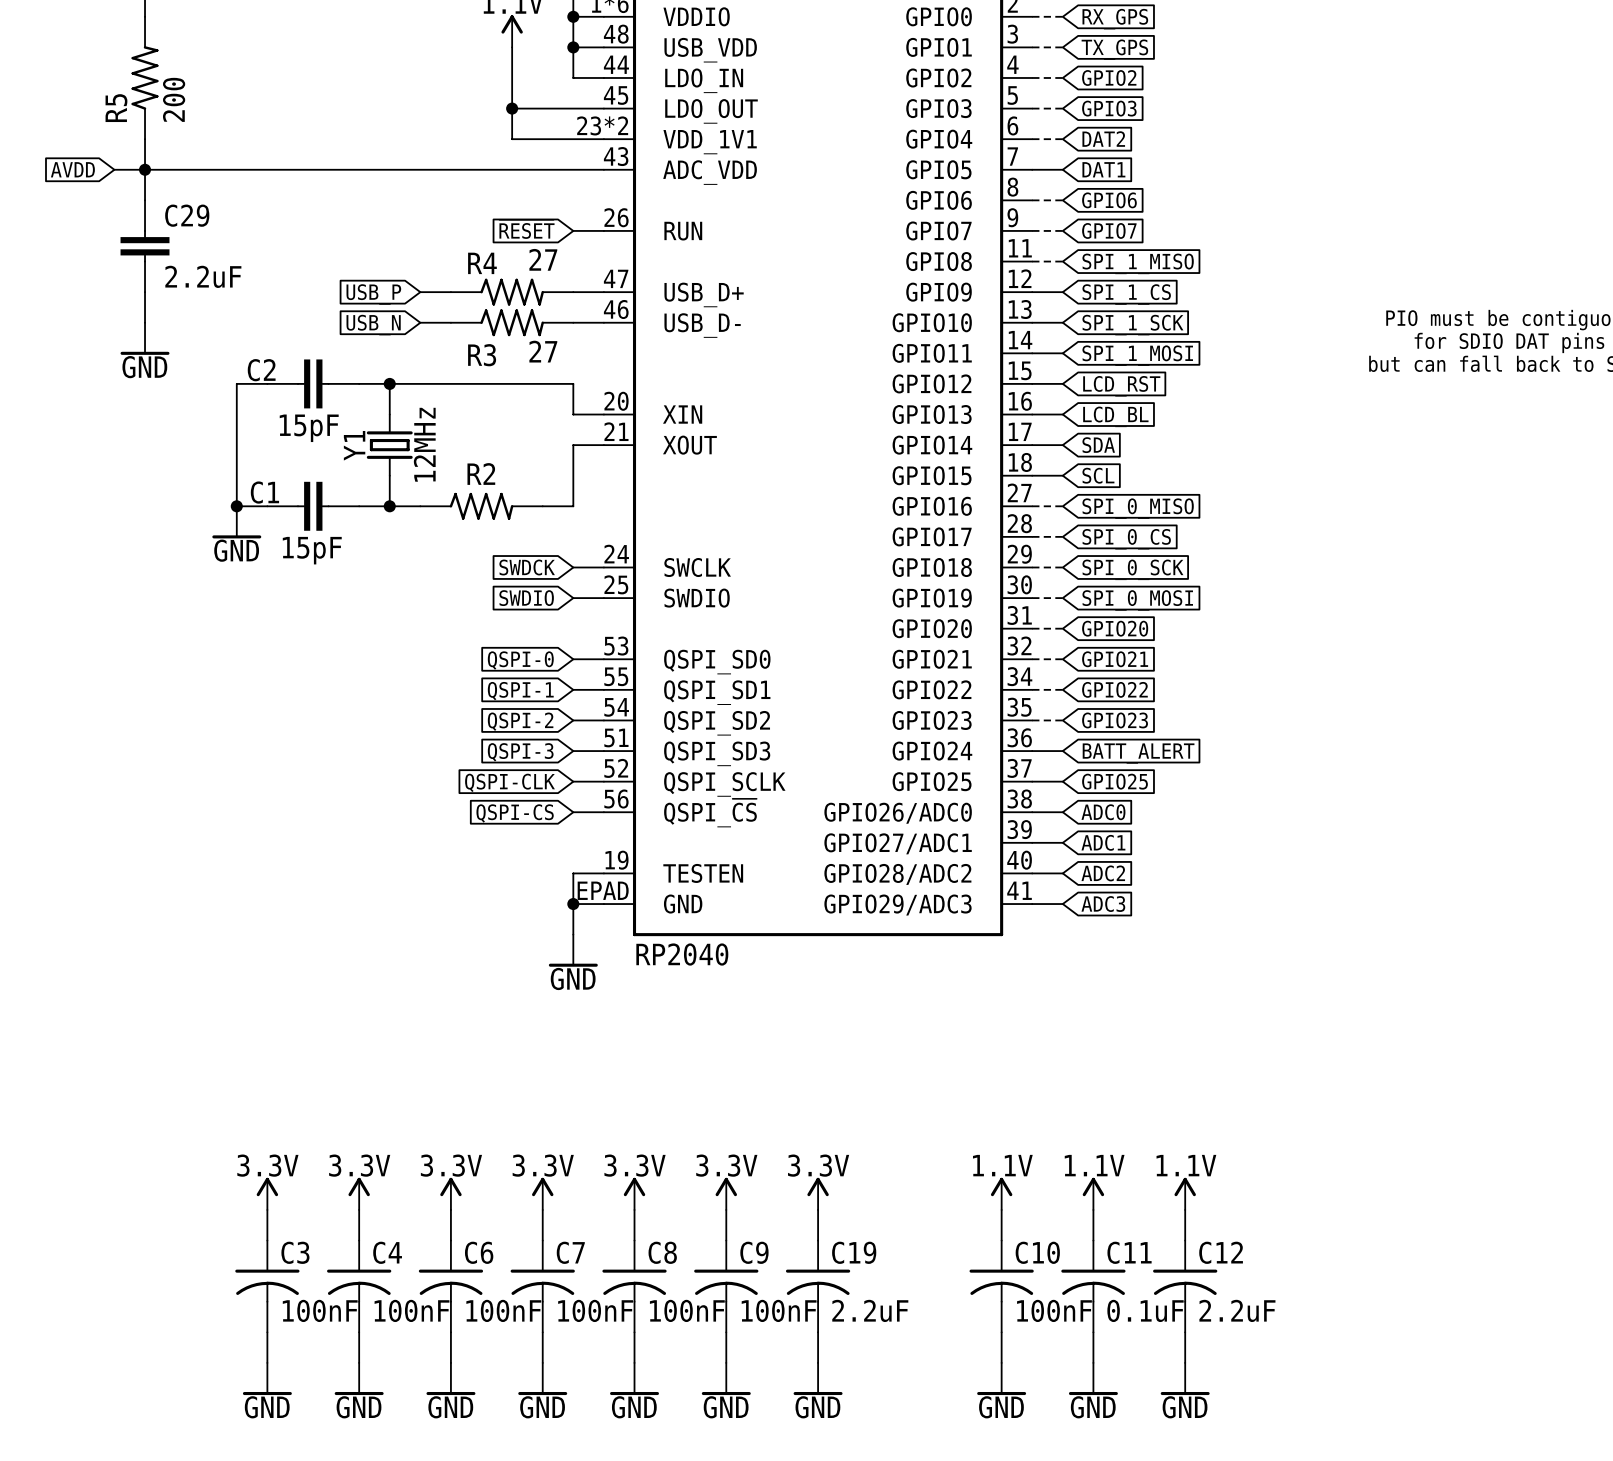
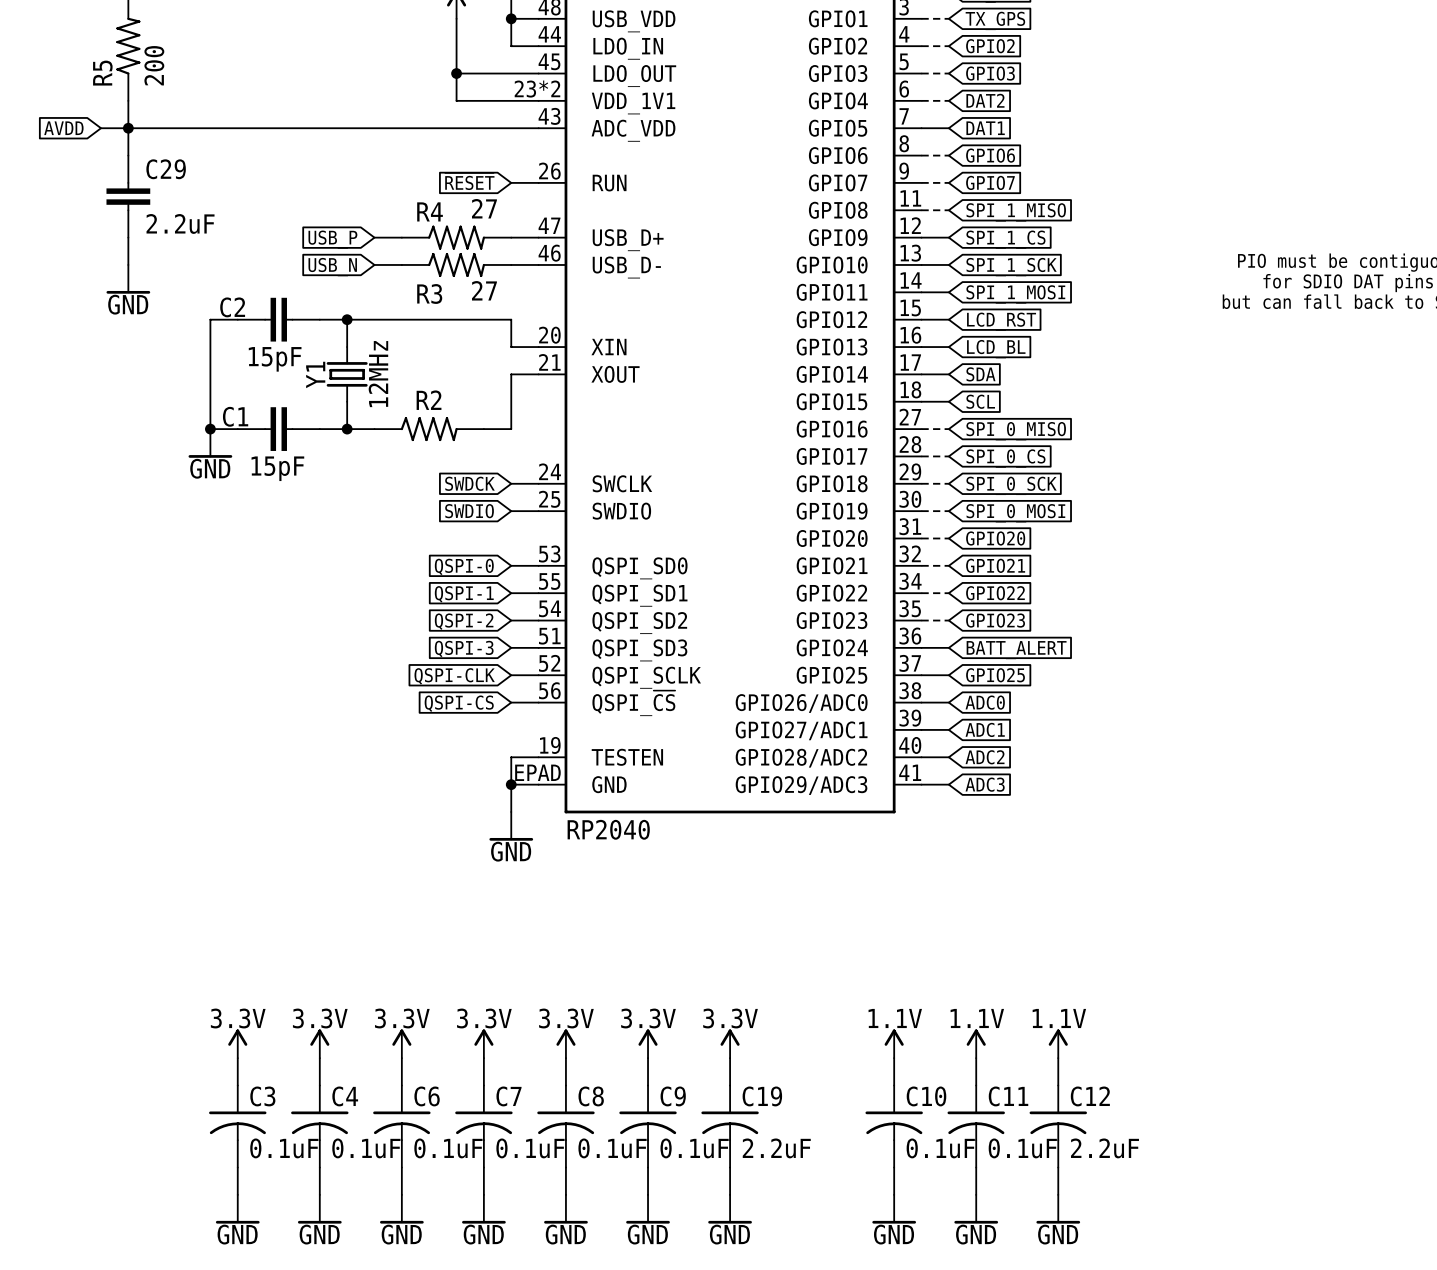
C3 value: 100nF (320, 1310) -> 0.1uF (284, 1148)
C4 value: 100nF (412, 1310) -> 0.1uF (366, 1148)
C6 value: 100nF (503, 1310) -> 0.1uF (448, 1148)
C7 value: 100nF (595, 1310) -> 0.1uF (530, 1148)
C8 value: 100nF (687, 1310) -> 0.1uF (612, 1148)
C9 value: 100nF (779, 1310) -> 0.1uF (694, 1148)
C10 value: 100nF (1054, 1310) -> 0.1uF (940, 1148)

